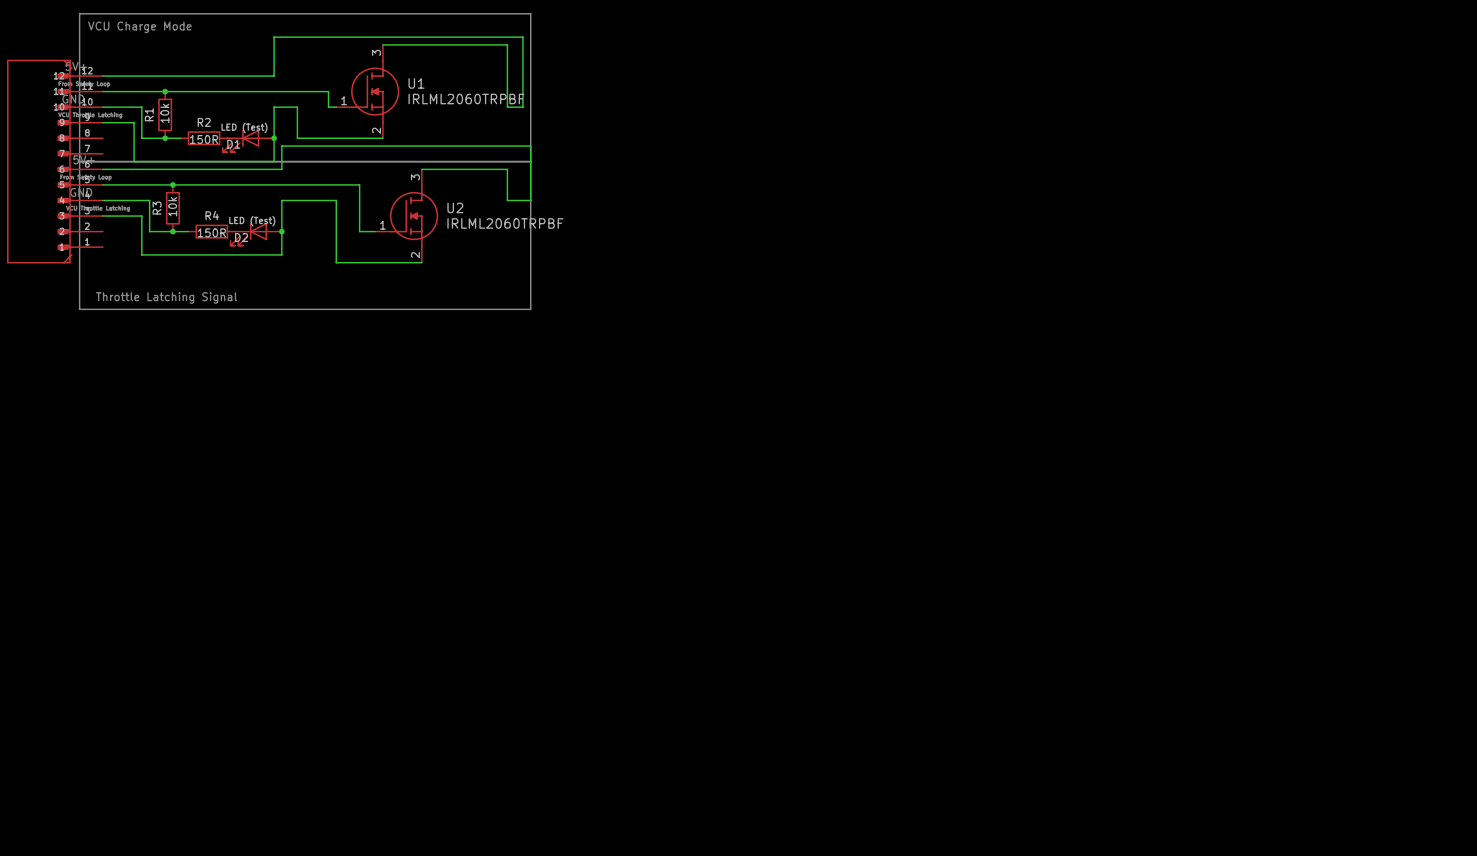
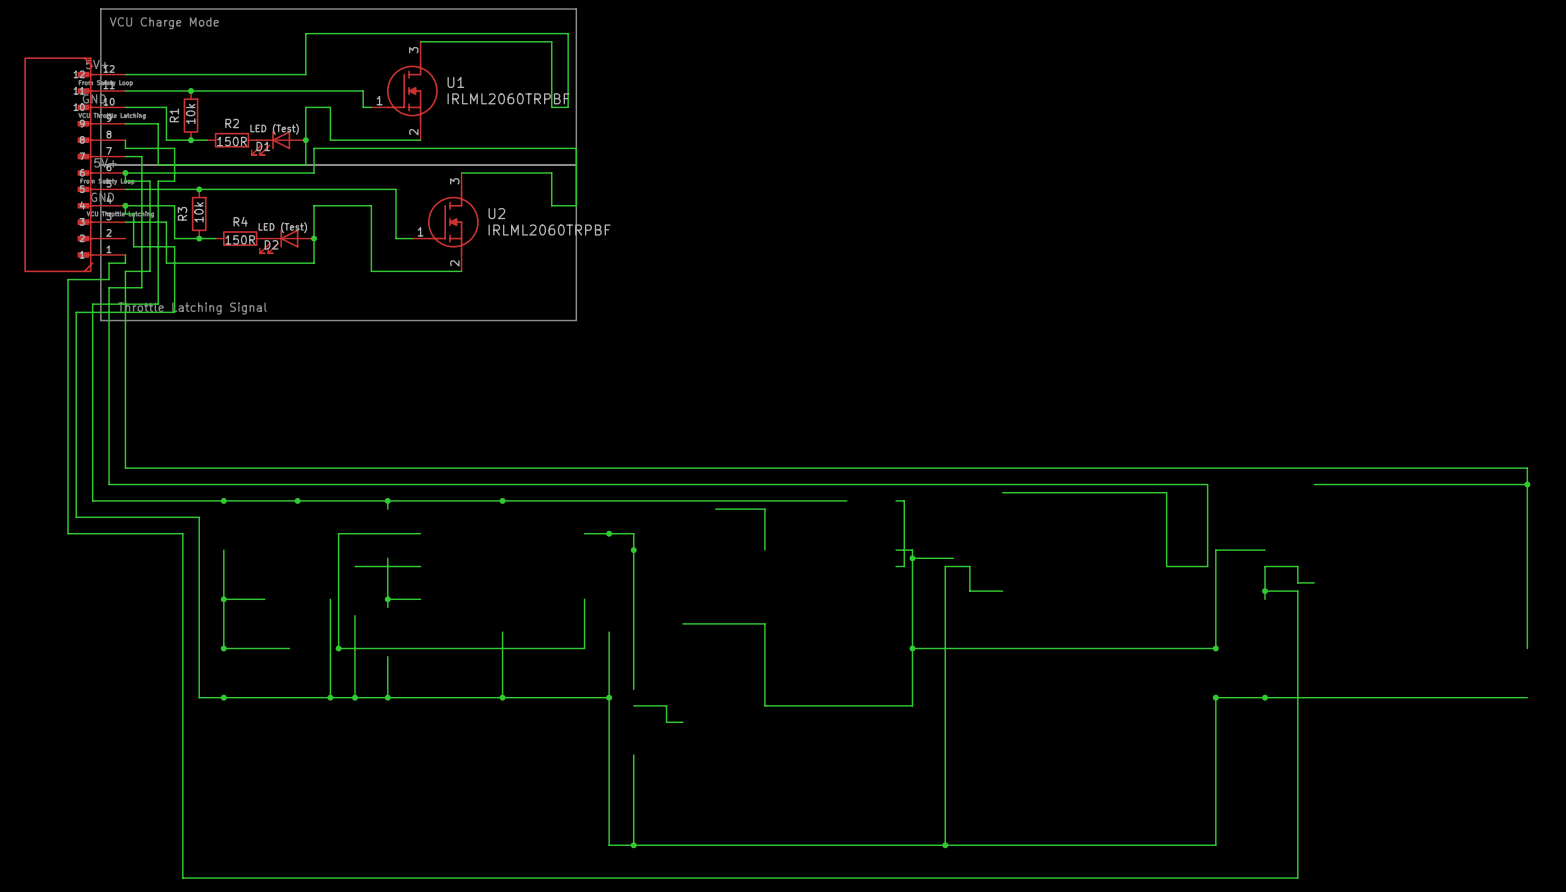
wire: none -> (125, 140) (125, 148) (174, 148) (174, 181) (158, 181) (158, 304) (92, 304) (92, 500) (846, 500)
wire: none -> (125, 156) (141, 156) (141, 287) (109, 287) (109, 484) (1207, 484) (1207, 566) (1166, 566) (1166, 492) (1002, 492)
wire: none -> (125, 172) (125, 181) (150, 181) (150, 271) (125, 271) (125, 468) (1527, 468) (1527, 648)
junction: none -> (125, 172)
wire: none -> (125, 205) (125, 213) (133, 213) (133, 246) (174, 246) (174, 312) (76, 312) (76, 517) (199, 517) (199, 697) (609, 697)
junction: none -> (125, 205)
wire: none -> (125, 254) (125, 263) (109, 263) (109, 279) (68, 279) (68, 533) (182, 533) (182, 878) (1297, 878) (1297, 591) (1265, 591)
wire: none -> (1314, 484) (1527, 484)
junction: none -> (1527, 484)
junction: none -> (223, 500)
junction: none -> (297, 500)
wire: none -> (387, 500) (387, 509)
junction: none -> (387, 500)
junction: none -> (502, 500)
wire: none -> (896, 500) (904, 500) (904, 566) (896, 566)
wire: none -> (715, 509) (764, 509) (764, 550)
wire: none -> (420, 533) (338, 533) (338, 648) (584, 648) (584, 599)
wire: none -> (584, 533) (633, 533) (633, 689)
junction: none -> (609, 533)
wire: none -> (223, 550) (223, 648) (289, 648)
junction: none -> (633, 550)
wire: none -> (896, 550) (912, 550) (912, 705) (764, 705) (764, 623) (682, 623)
wire: none -> (1265, 550) (1215, 550) (1215, 648) (912, 648)
wire: none -> (387, 558) (387, 607)
wire: none -> (912, 558) (953, 558)
junction: none -> (912, 558)
wire: none -> (354, 566) (420, 566)
wire: none -> (1314, 582) (1297, 582) (1297, 566) (1265, 566) (1265, 599)
wire: none -> (1002, 591) (969, 591) (969, 566) (945, 566) (945, 845)
junction: none -> (1265, 591)
wire: none -> (223, 599) (264, 599)
junction: none -> (223, 599)
wire: none -> (330, 599) (330, 697)
wire: none -> (387, 599) (420, 599)
junction: none -> (387, 599)
wire: none -> (354, 615) (354, 697)
wire: none -> (502, 632) (502, 697)
wire: none -> (609, 632) (609, 845) (1215, 845) (1215, 697) (1527, 697)
junction: none -> (223, 648)
junction: none -> (338, 648)
junction: none -> (912, 648)
junction: none -> (1215, 648)
wire: none -> (387, 656) (387, 697)
junction: none -> (223, 697)
junction: none -> (330, 697)
junction: none -> (354, 697)
junction: none -> (387, 697)
junction: none -> (502, 697)
junction: none -> (609, 697)
junction: none -> (1215, 697)
junction: none -> (1265, 697)
wire: none -> (633, 705) (666, 705) (666, 722) (682, 722)
wire: none -> (633, 755) (633, 845)
junction: none -> (633, 845)
junction: none -> (945, 845)

